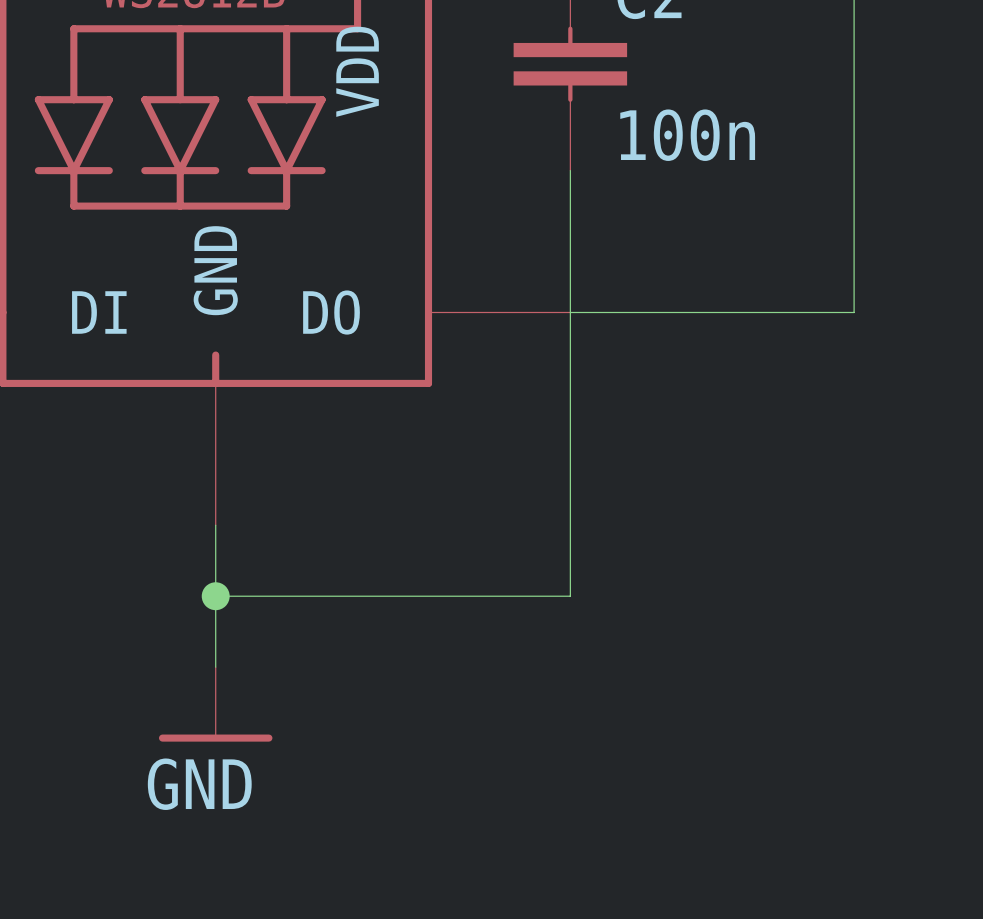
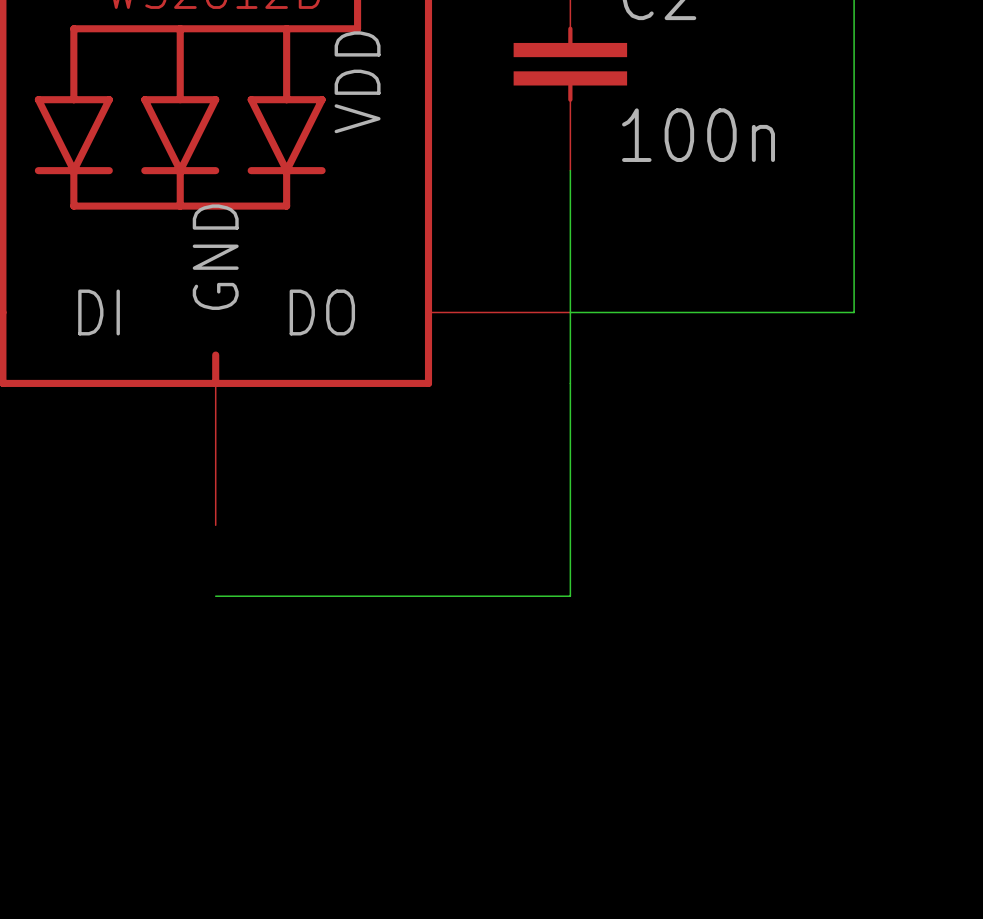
wire: (215, 525) (215, 667) -> none
junction: (215, 596) -> none
power symbol: GND (215, 704) -> none

